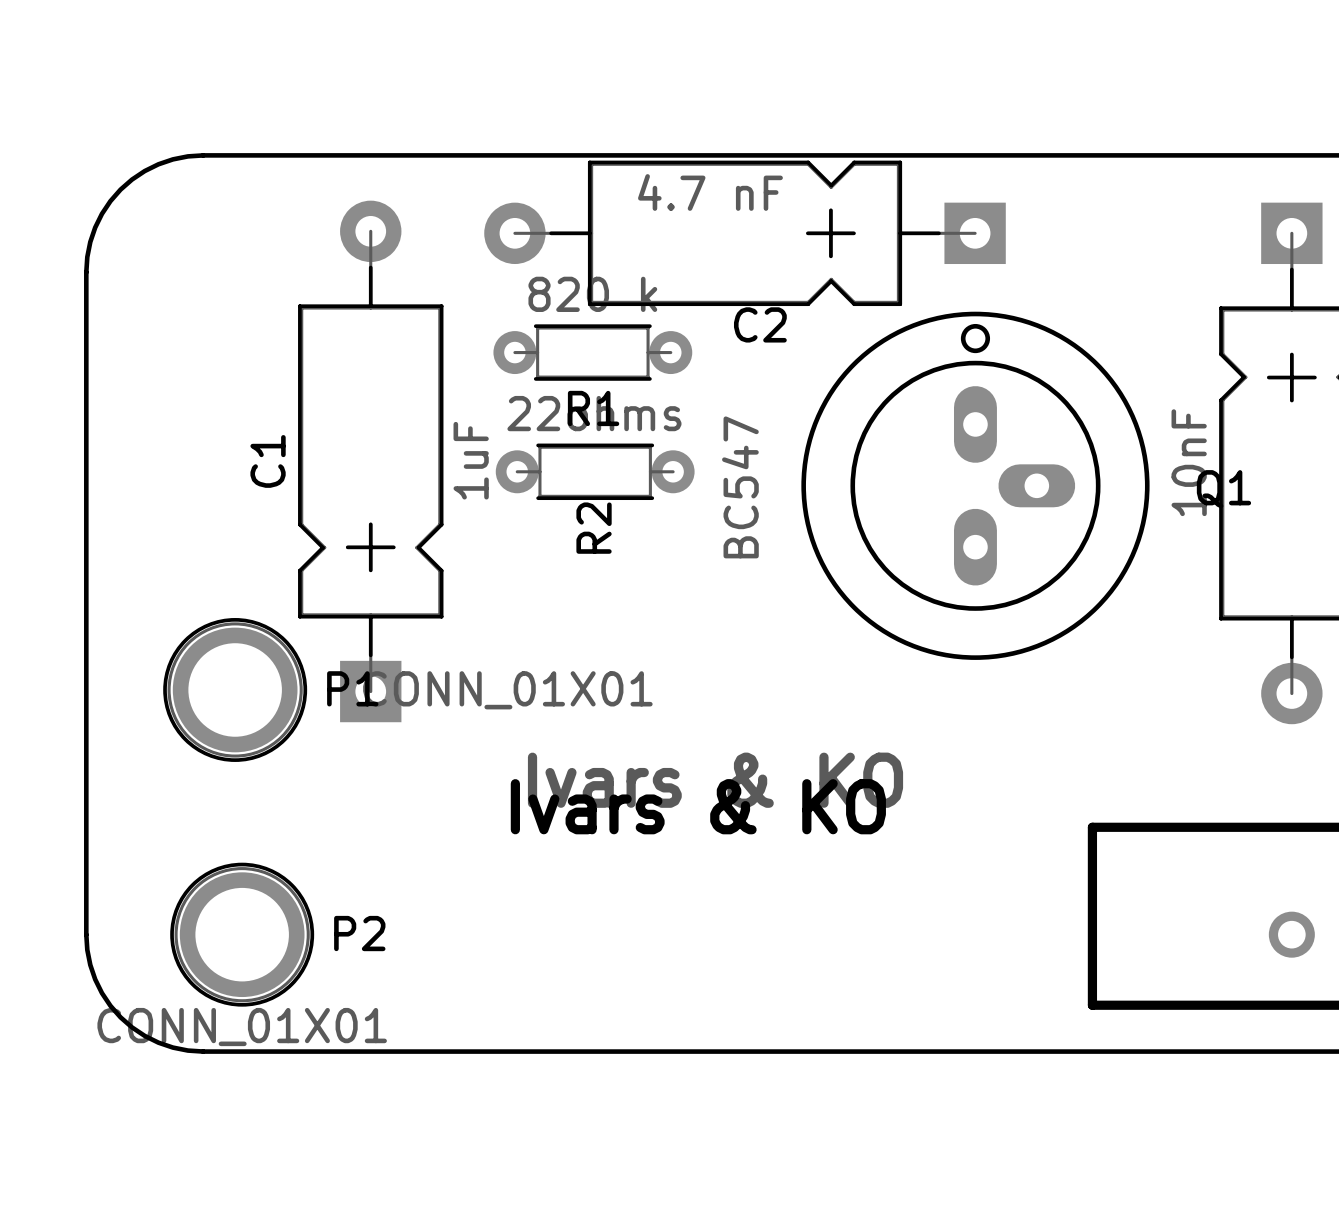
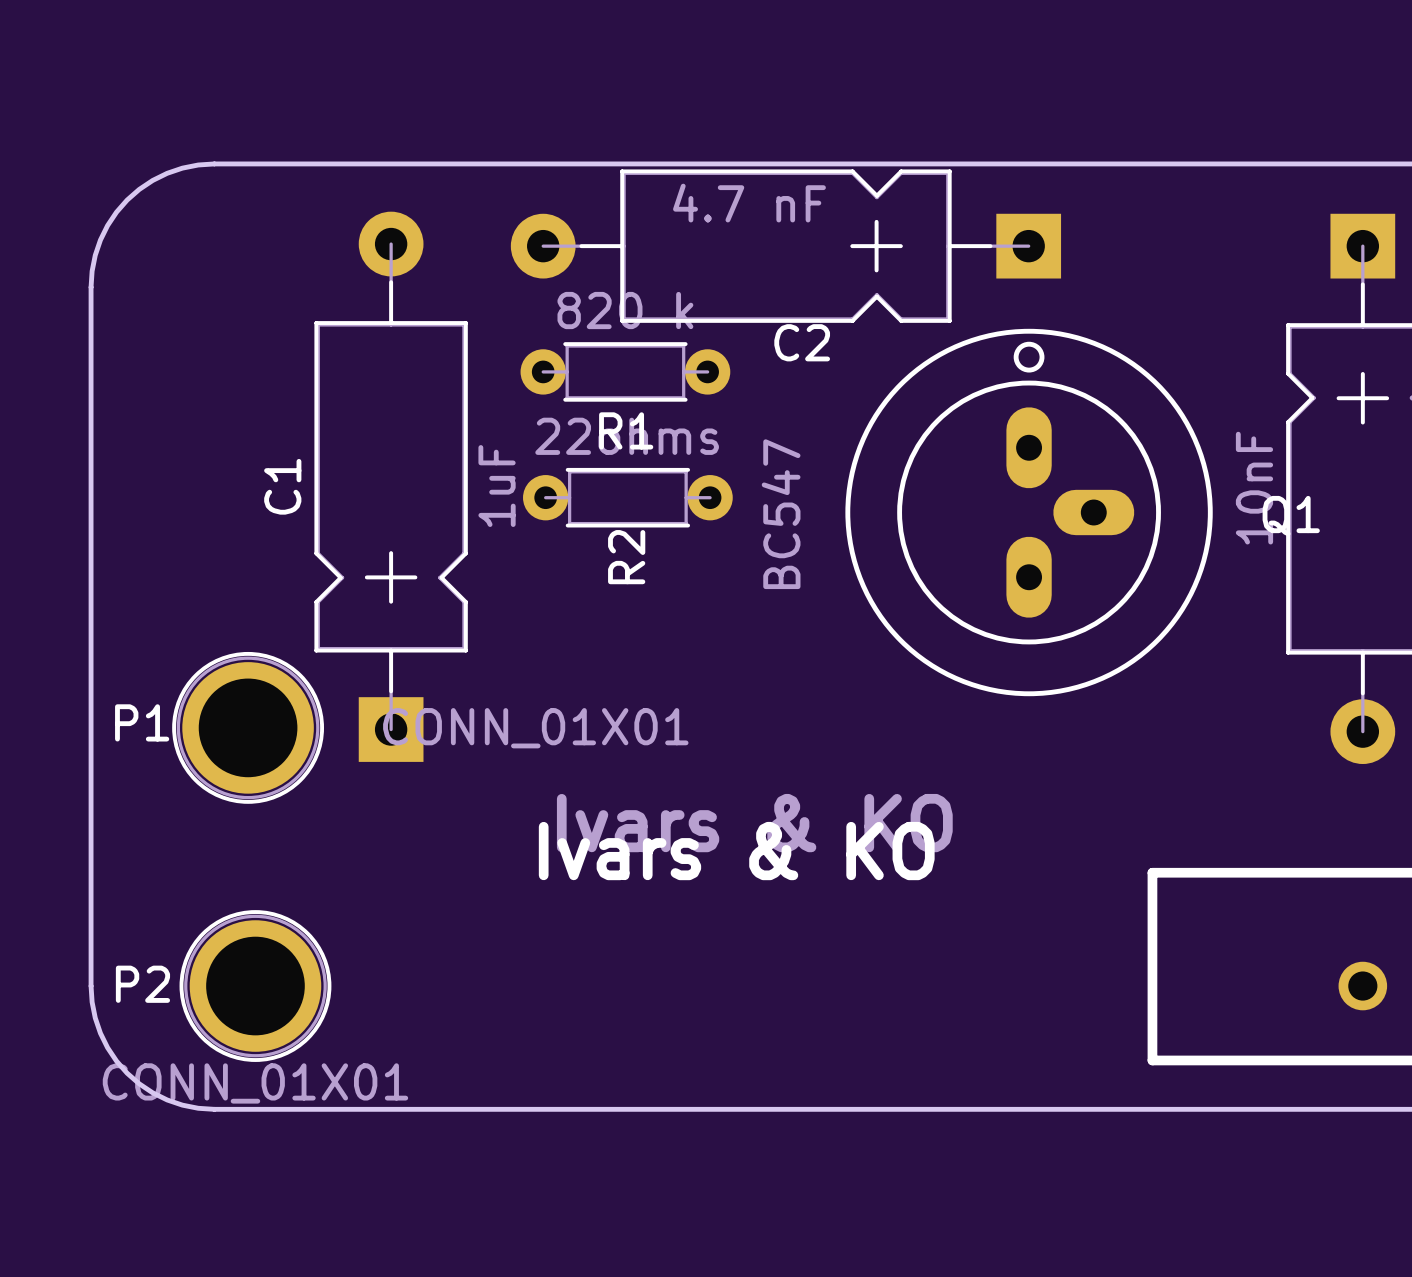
P1 name position: P1 (352, 688) -> P1 (142, 722)
P2 name position: P2 (359, 933) -> P2 (142, 984)

